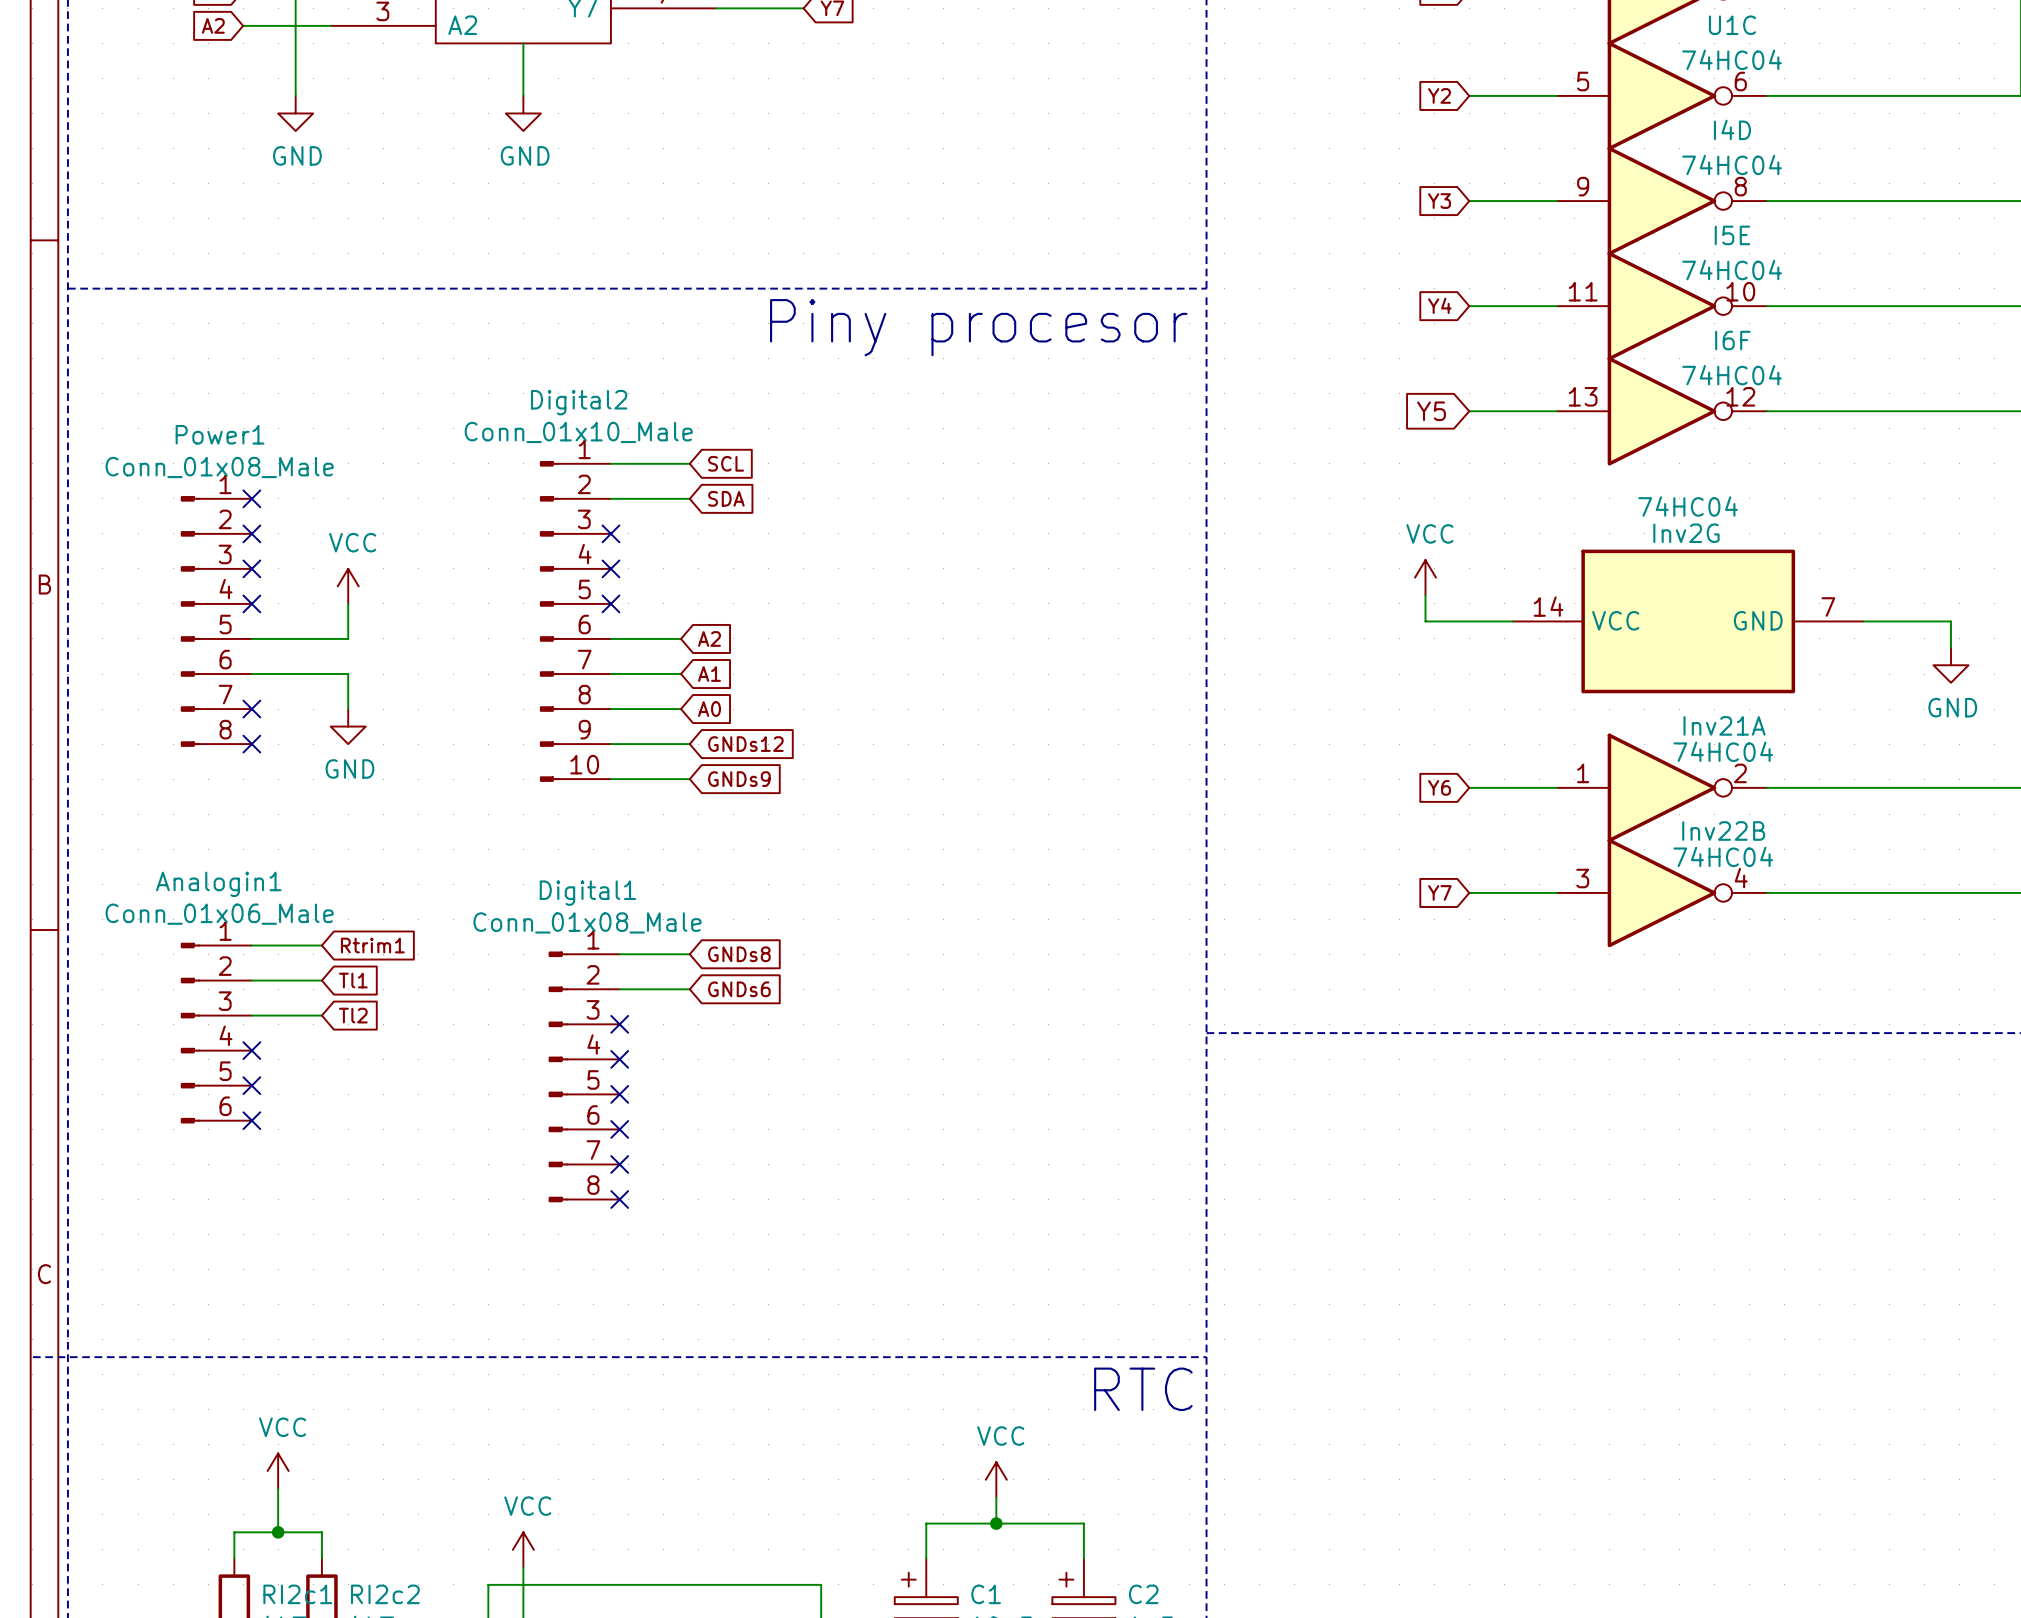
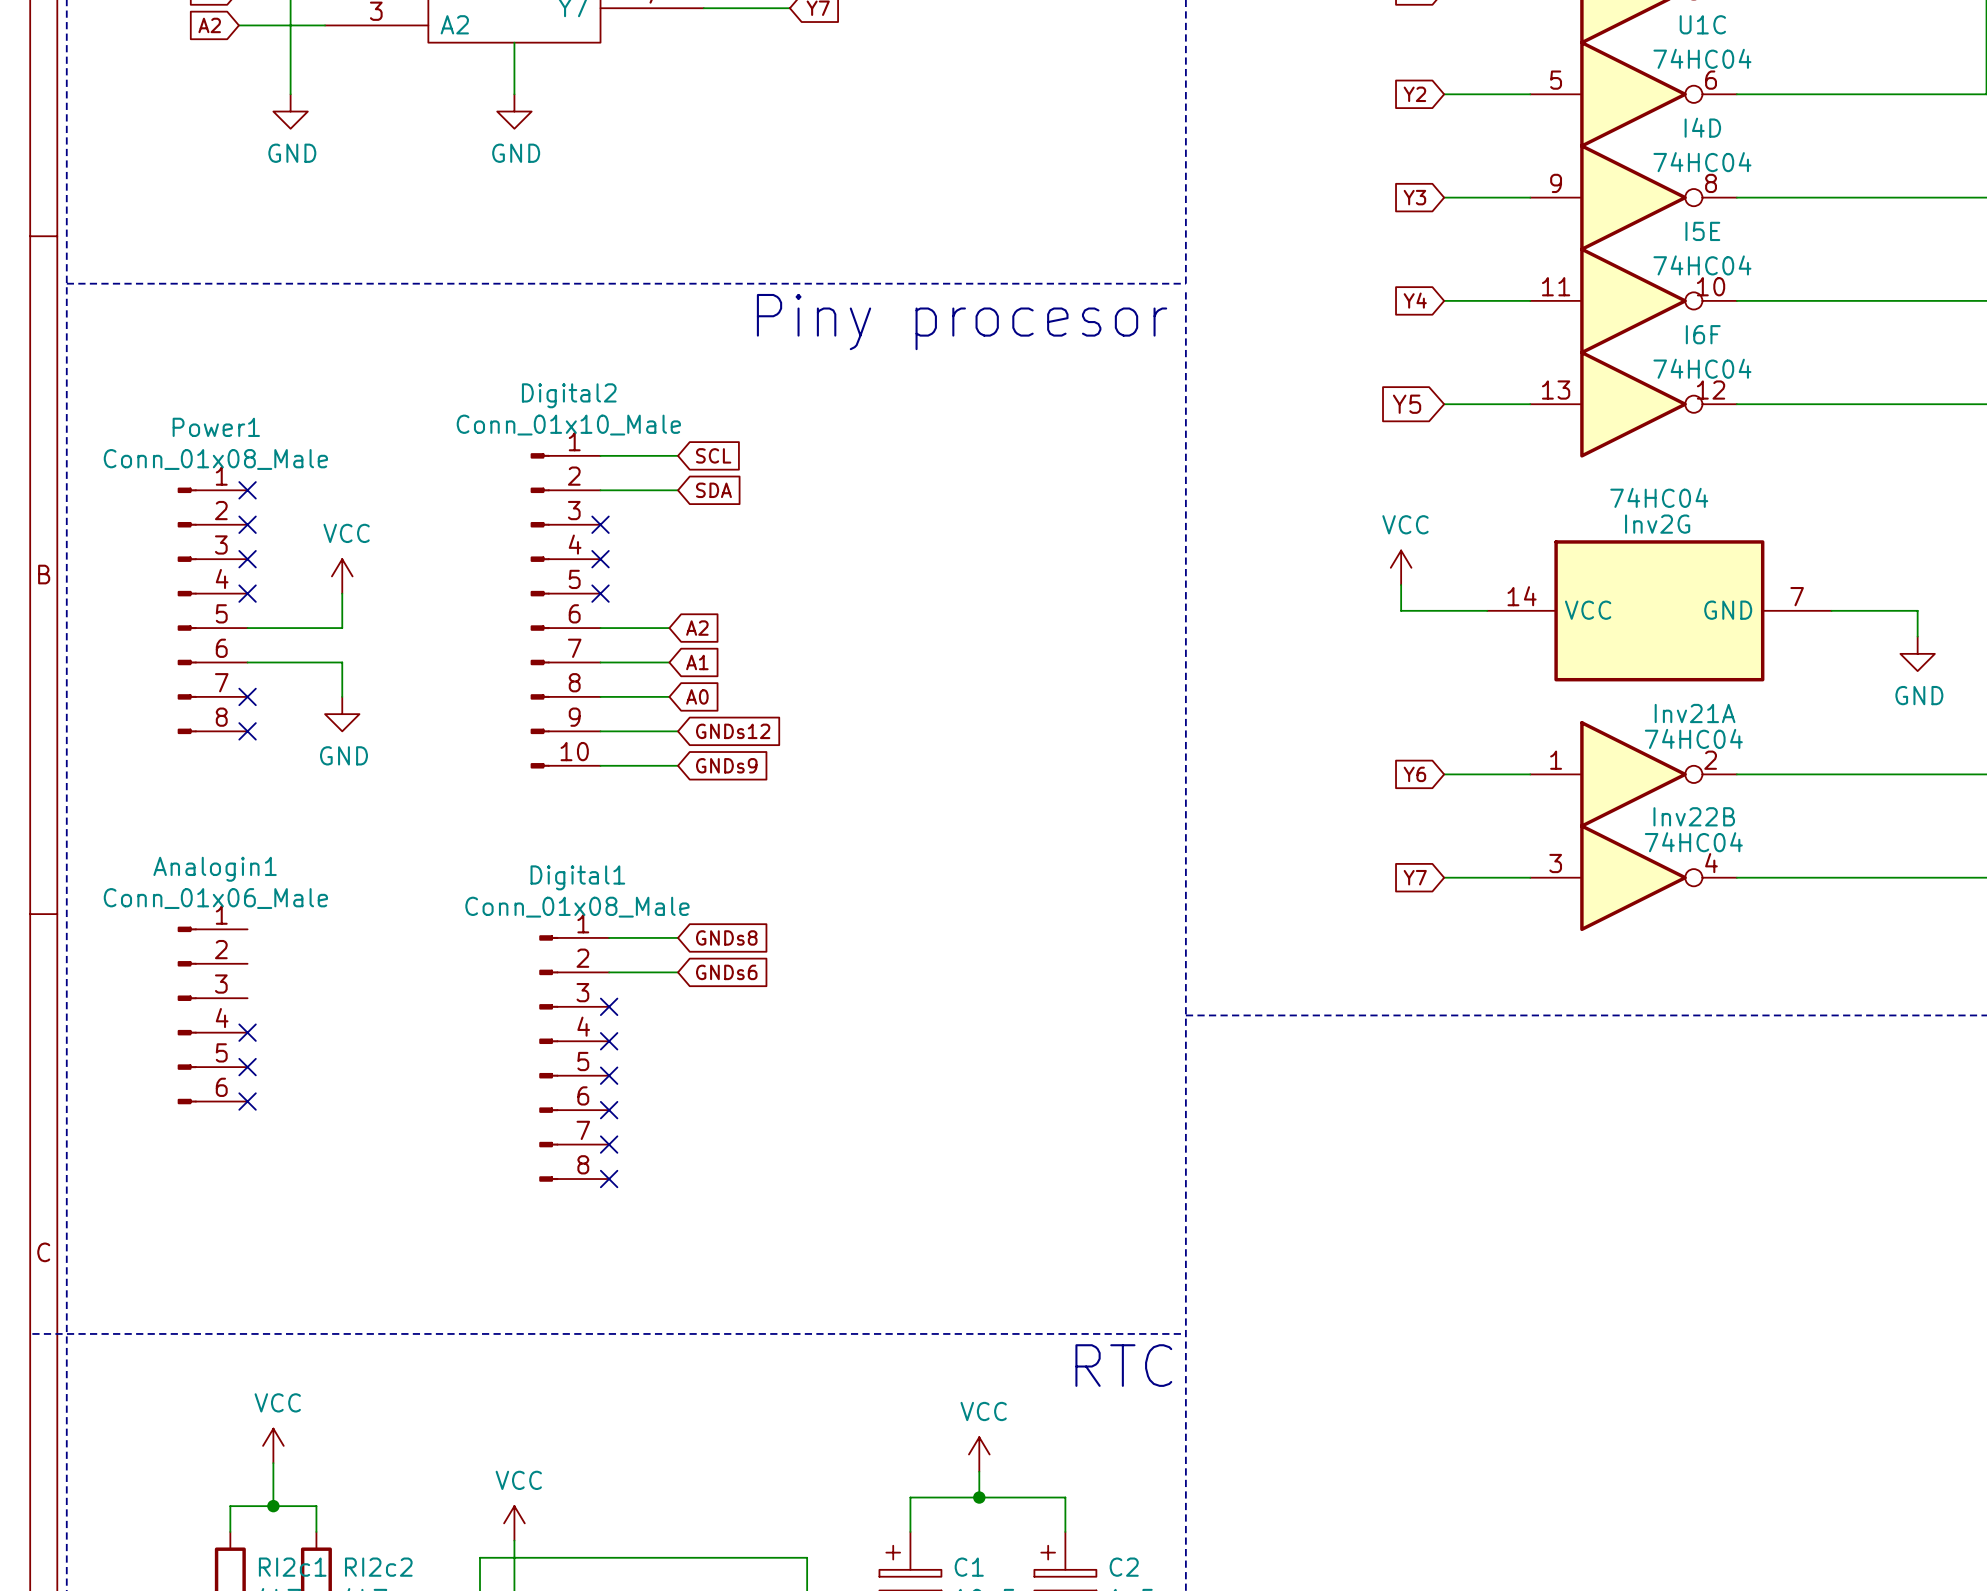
wire: (251, 945) (321, 945) -> none
global label: Rtrim1 (372, 945) -> none
wire: (251, 980) (321, 980) -> none
global label: Tl1 (353, 980) -> none
wire: (251, 1015) (321, 1015) -> none
global label: Tl2 (353, 1015) -> none

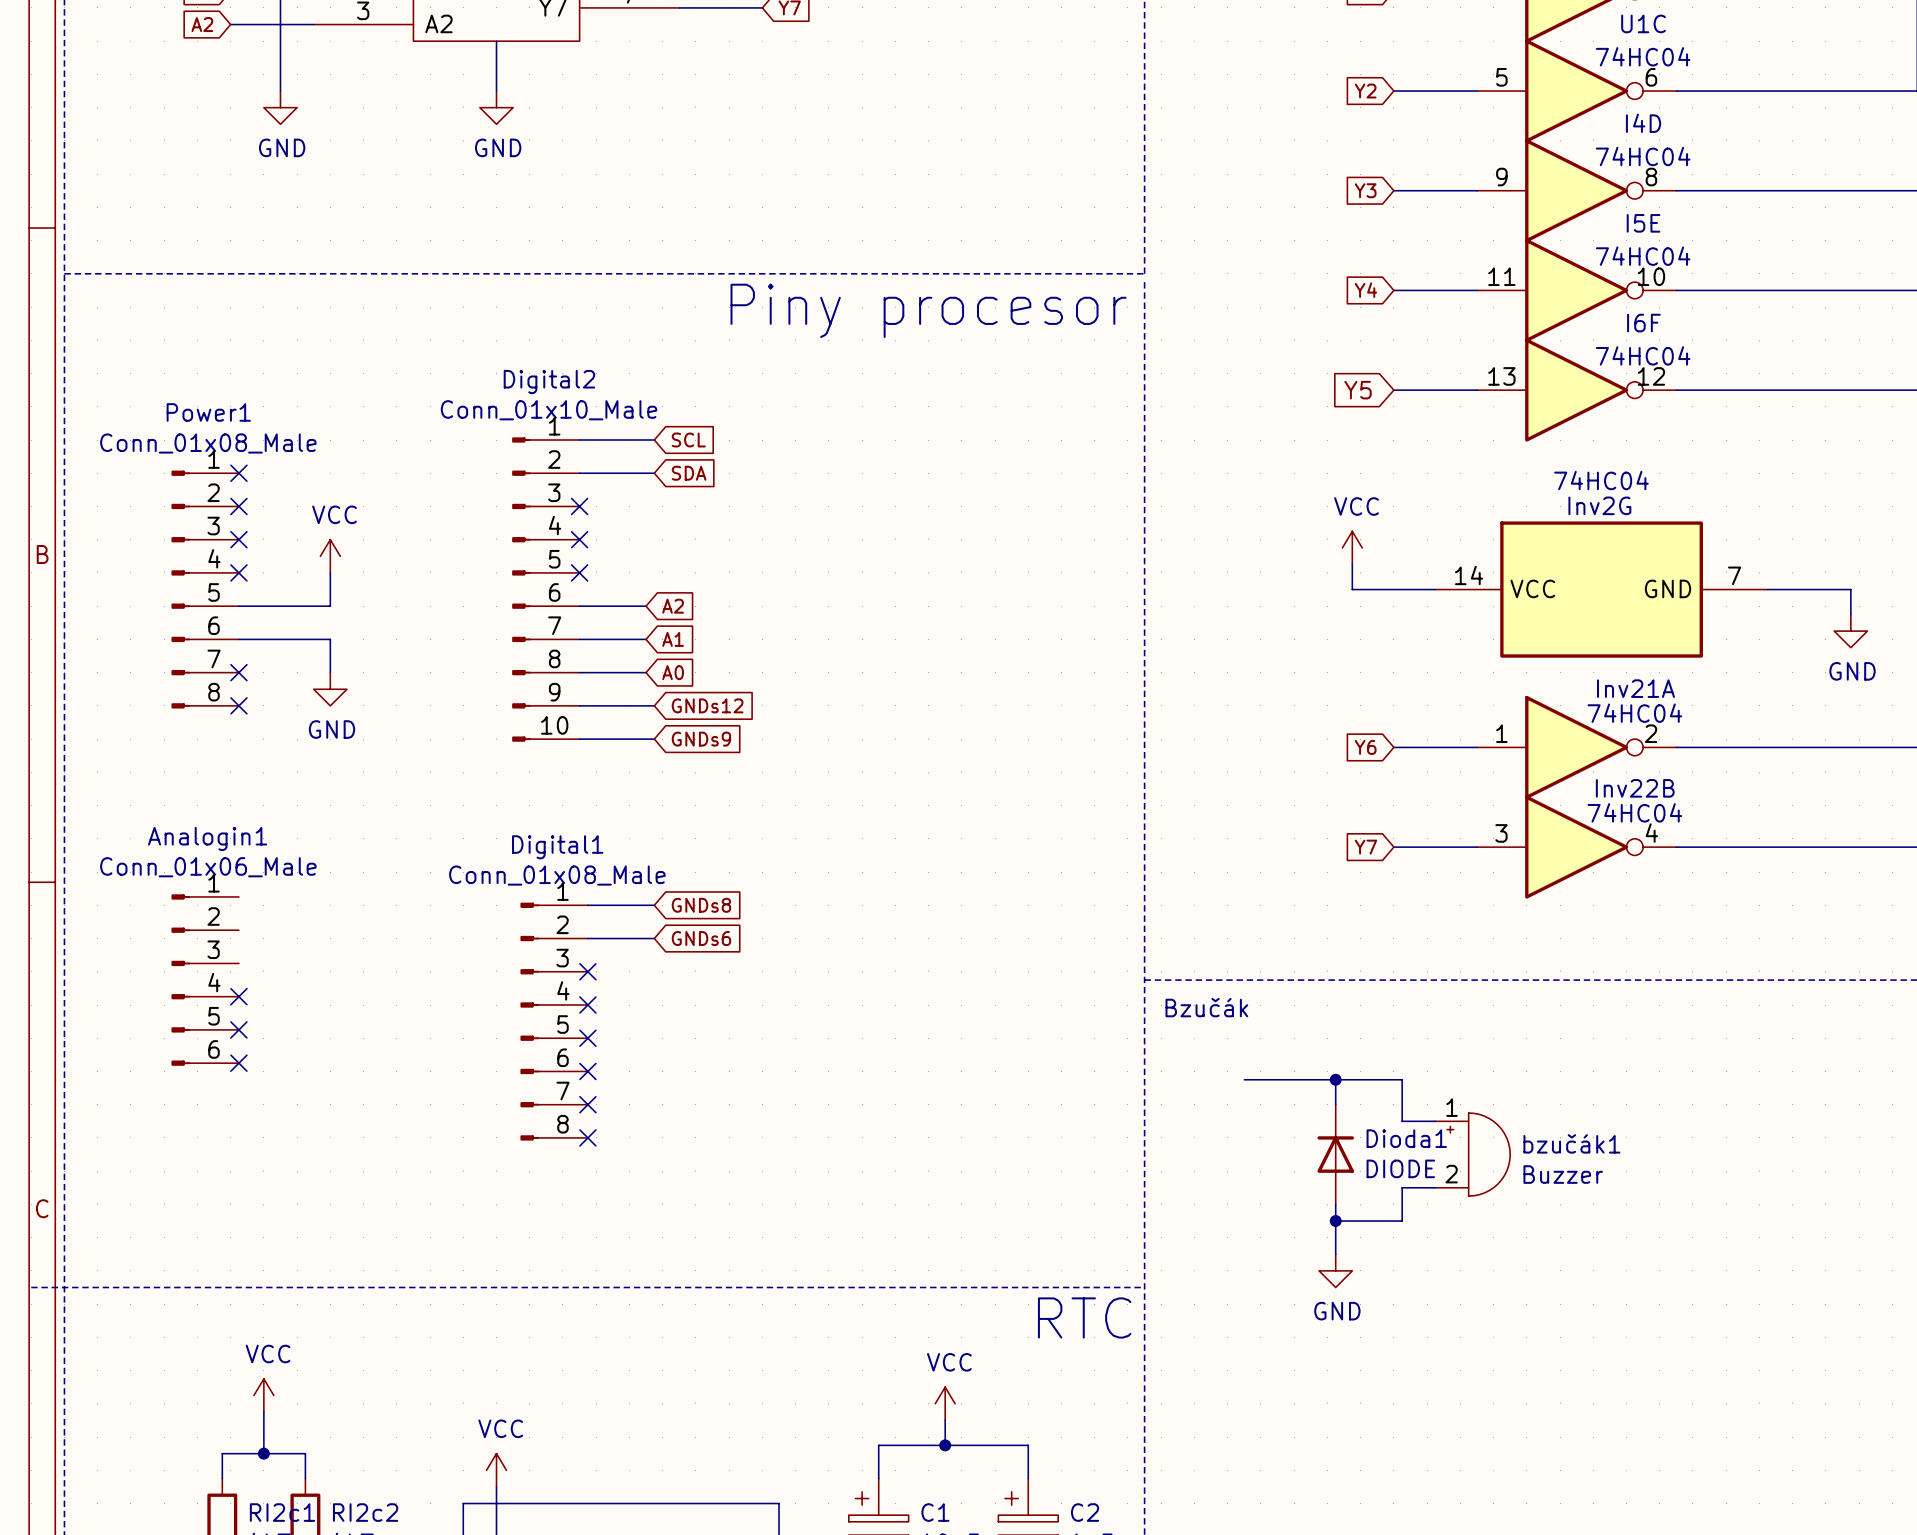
text: none -> Bzučák (1206, 1007)
wire: none -> (1244, 1079) (1402, 1079) (1402, 1121) (1435, 1121)
wire: none -> (1335, 1079) (1335, 1104)
junction: none -> (1335, 1079)
Dioda1: none -> DIODE (1335, 1154)
bzučák1: none -> Buzzer (1472, 1154)
wire: none -> (1435, 1187) (1402, 1187) (1402, 1221) (1335, 1221)
wire: none -> (1335, 1204) (1335, 1254)
junction: none -> (1335, 1221)
power symbol: none -> GND (1335, 1270)

